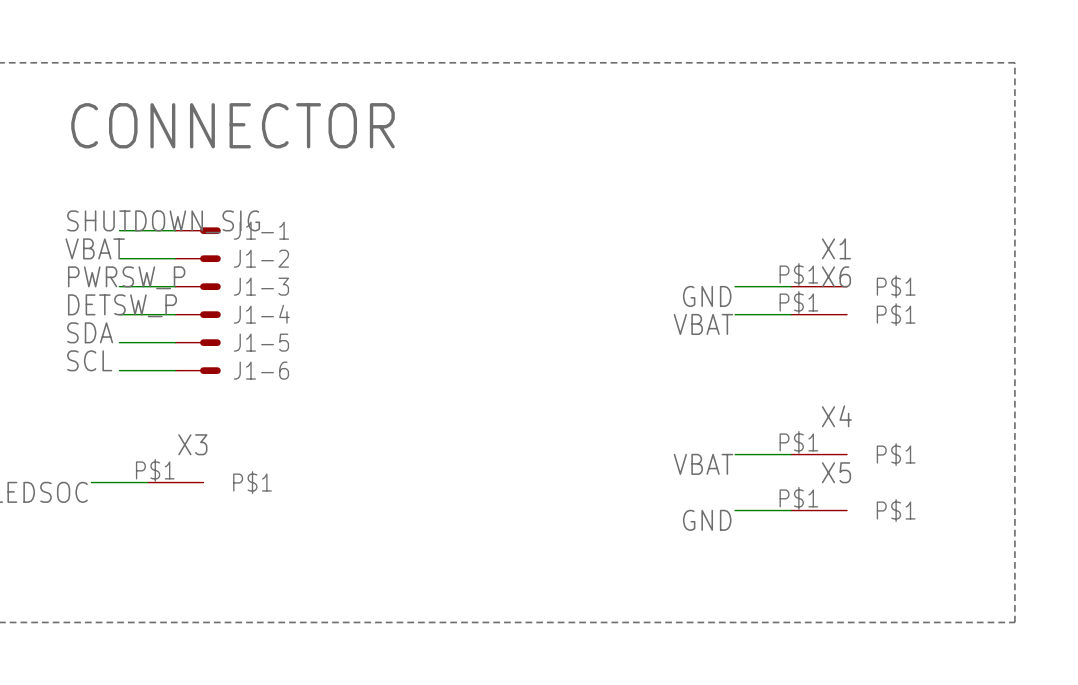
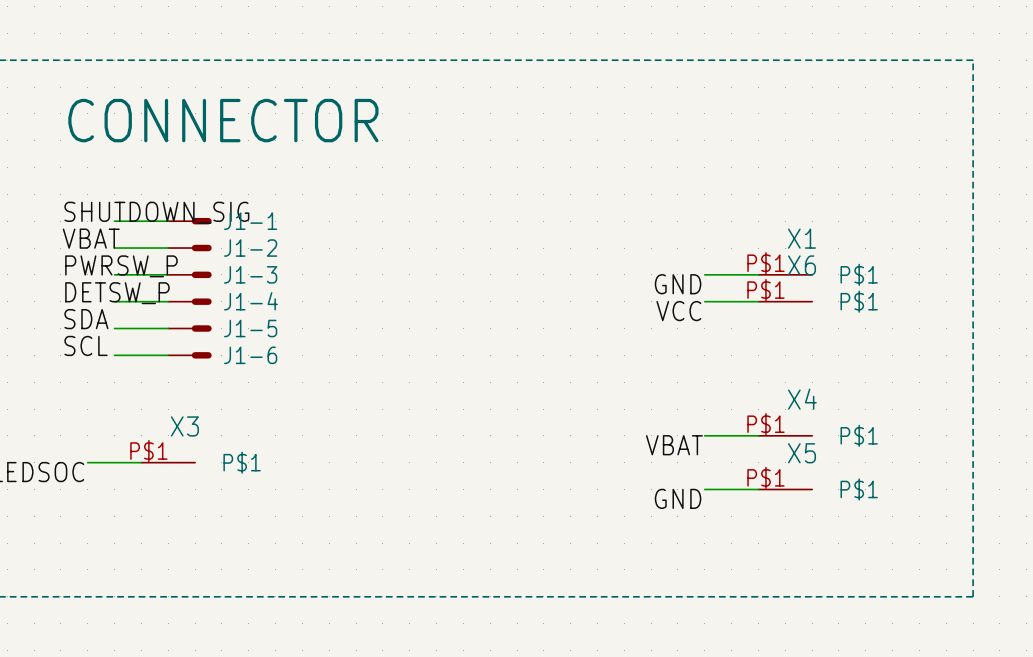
label: VBAT (703, 324) -> VCC (678, 311)

